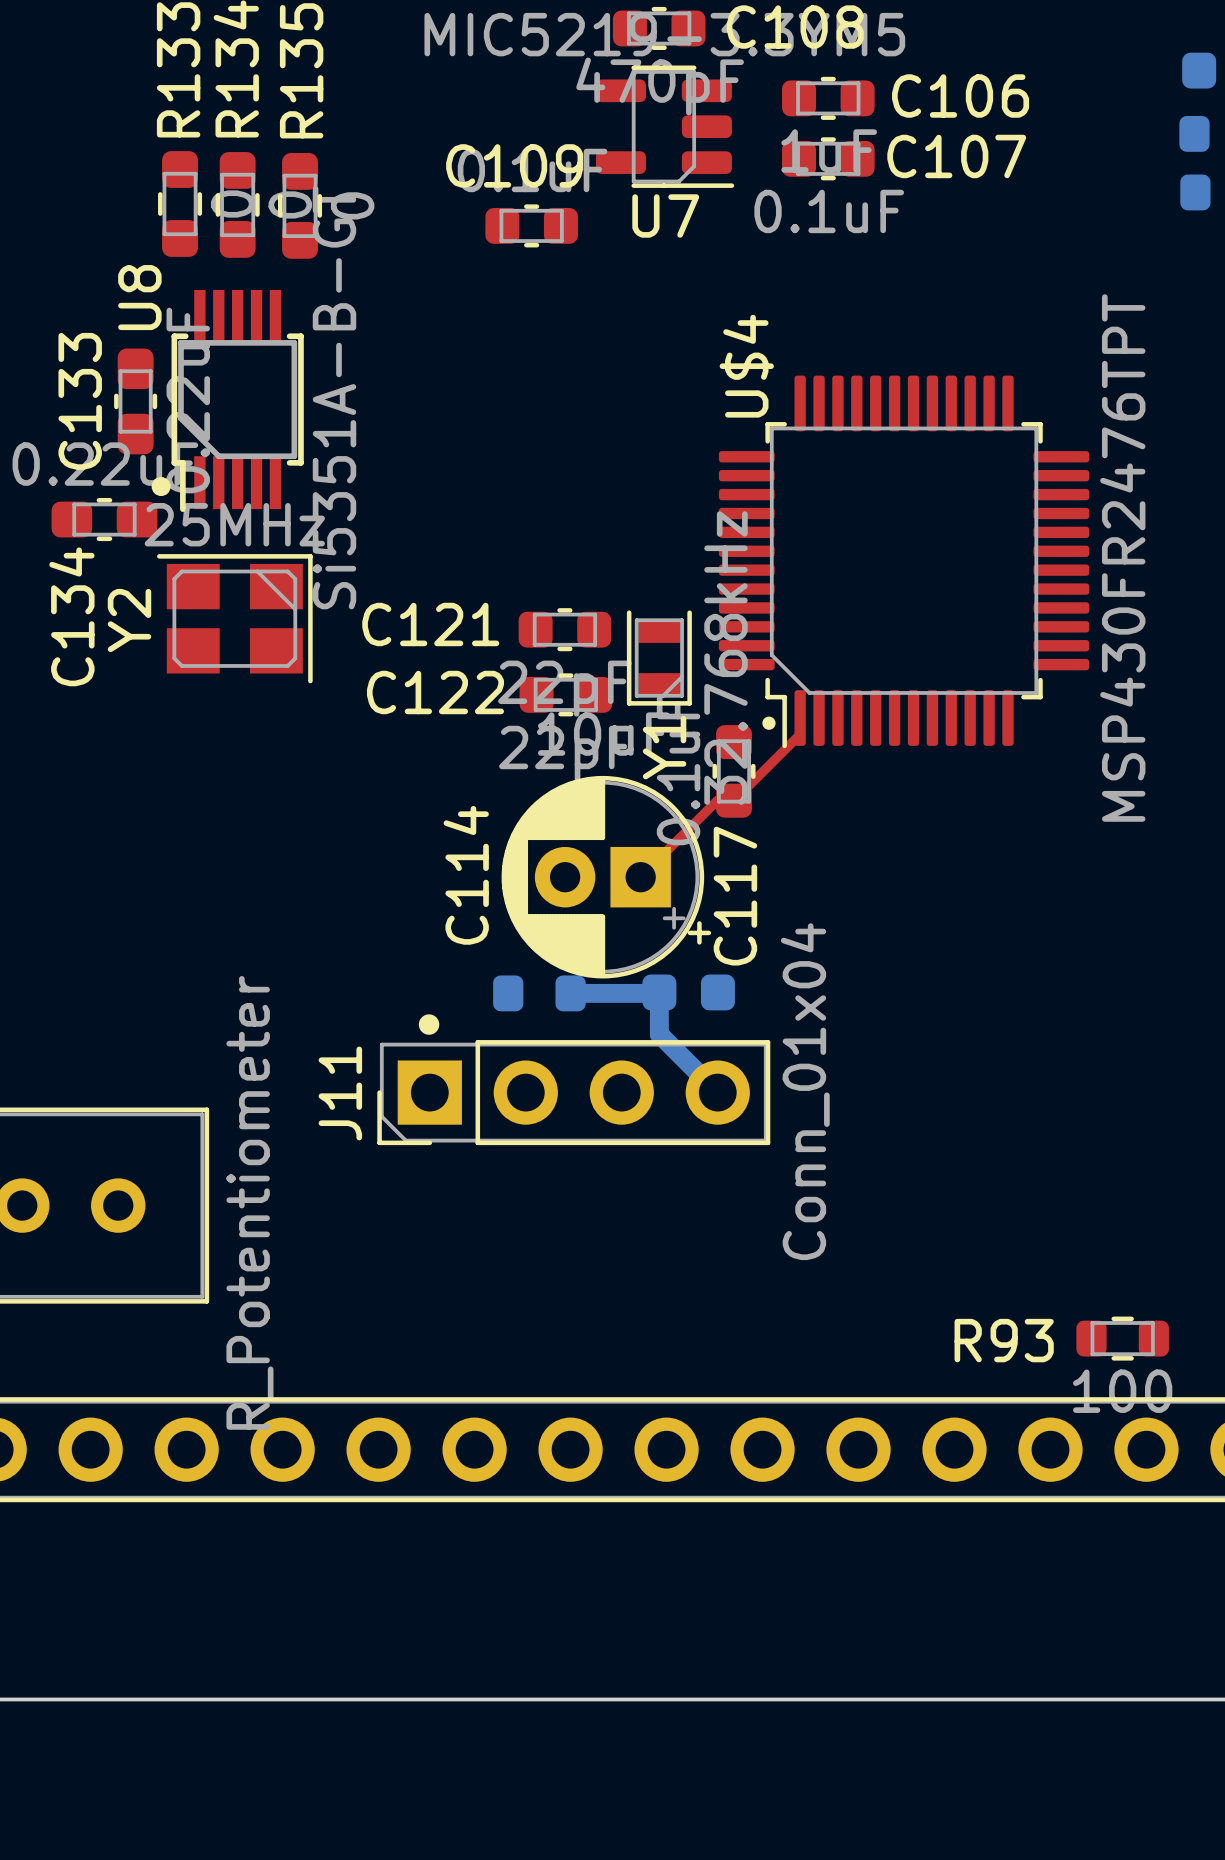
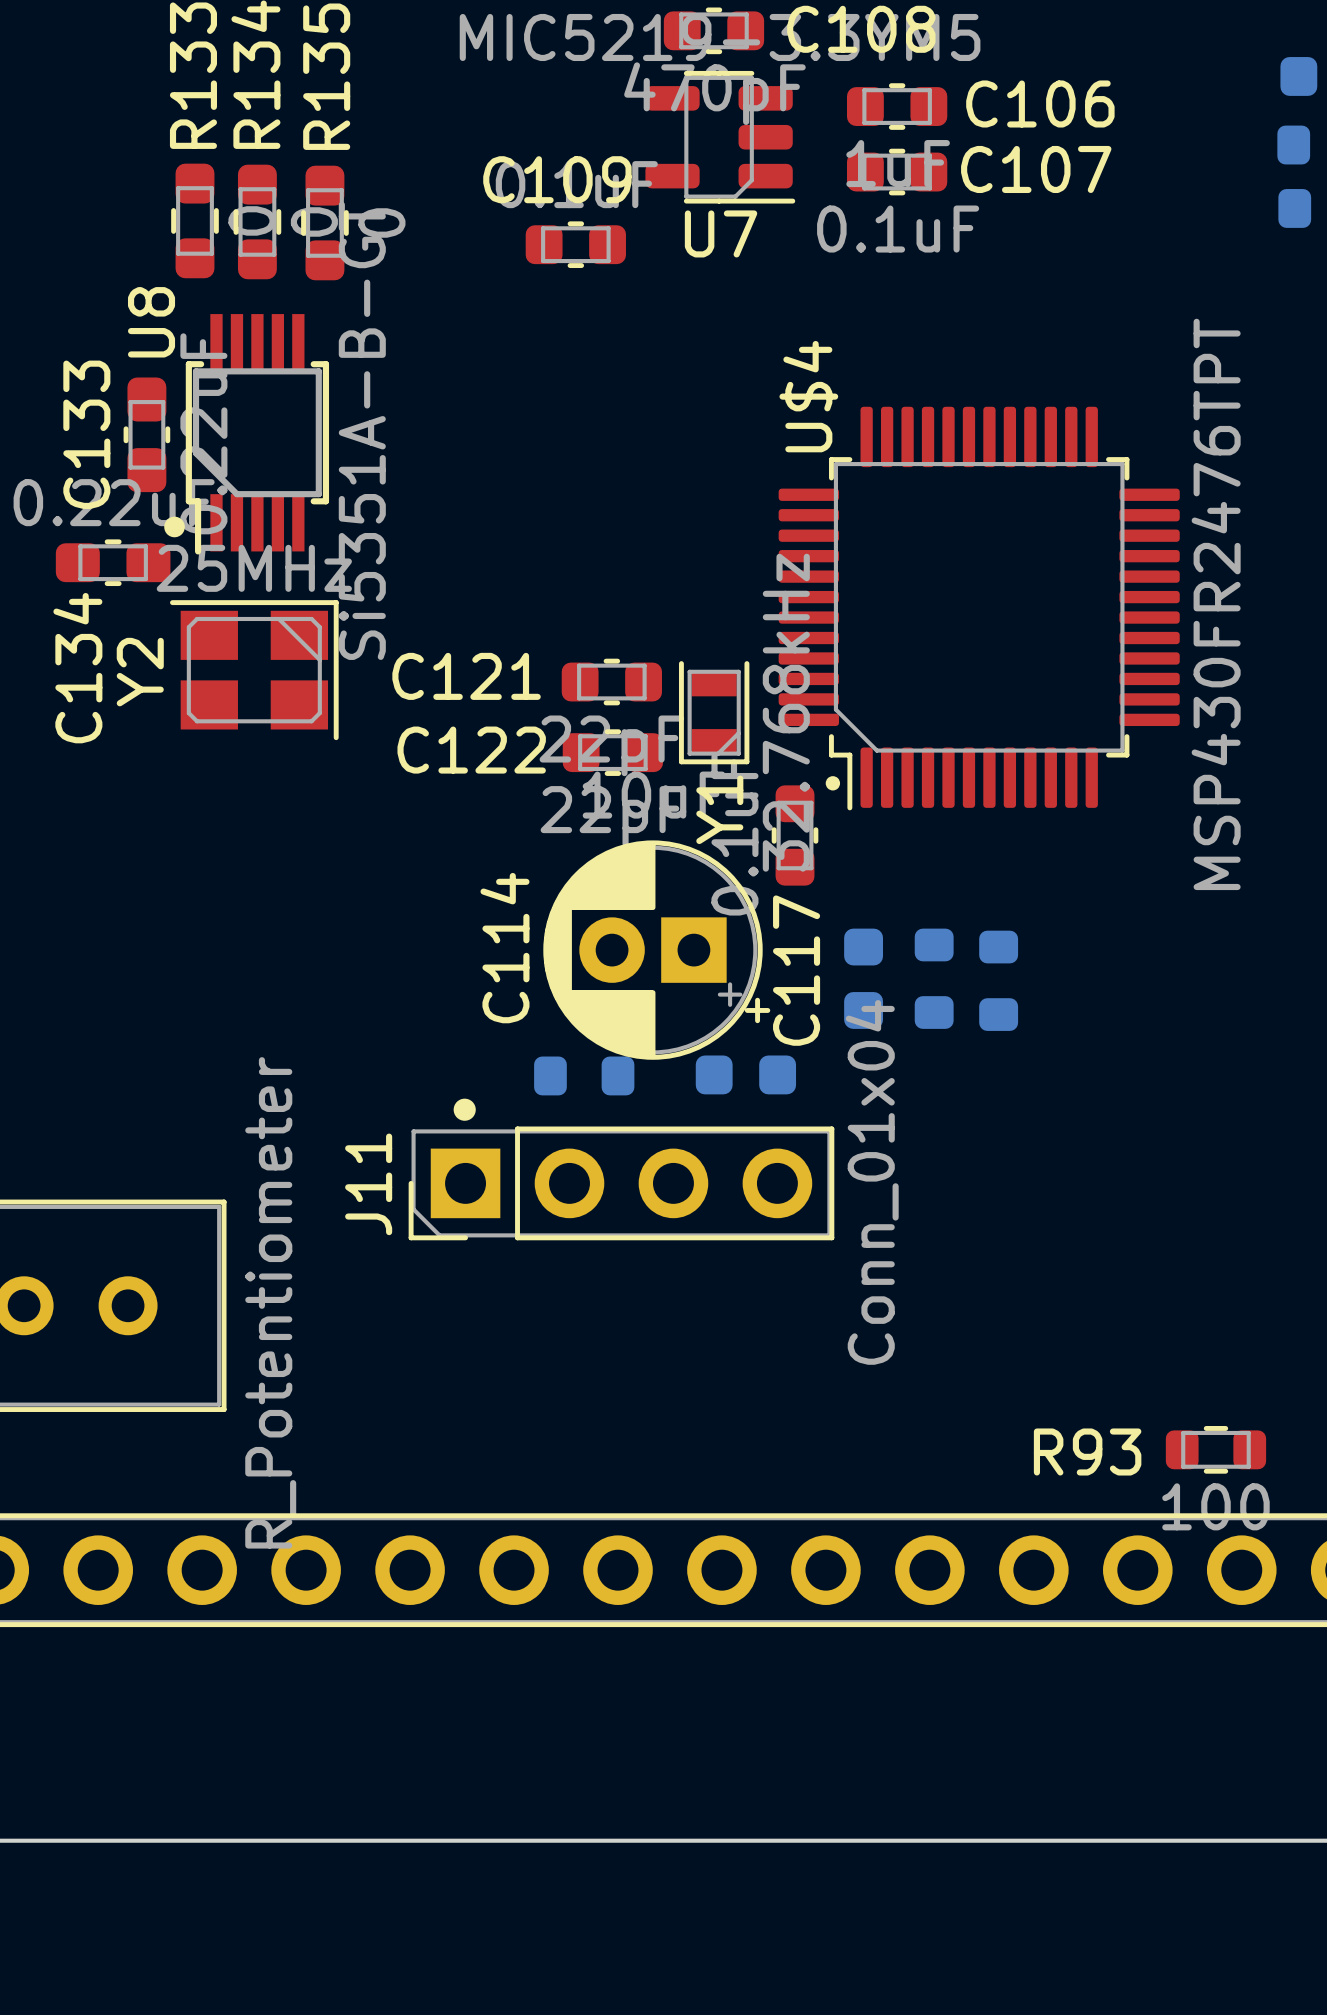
top track: (800, 718) (800, 734) (734, 800) (717, 800) (640, 877) -> none
part: none -> (863, 978)
part: none -> (934, 978)
part: none -> (998, 980)
bottom track: (570, 993) (659, 992) (659, 1034) (717, 1092) -> none

